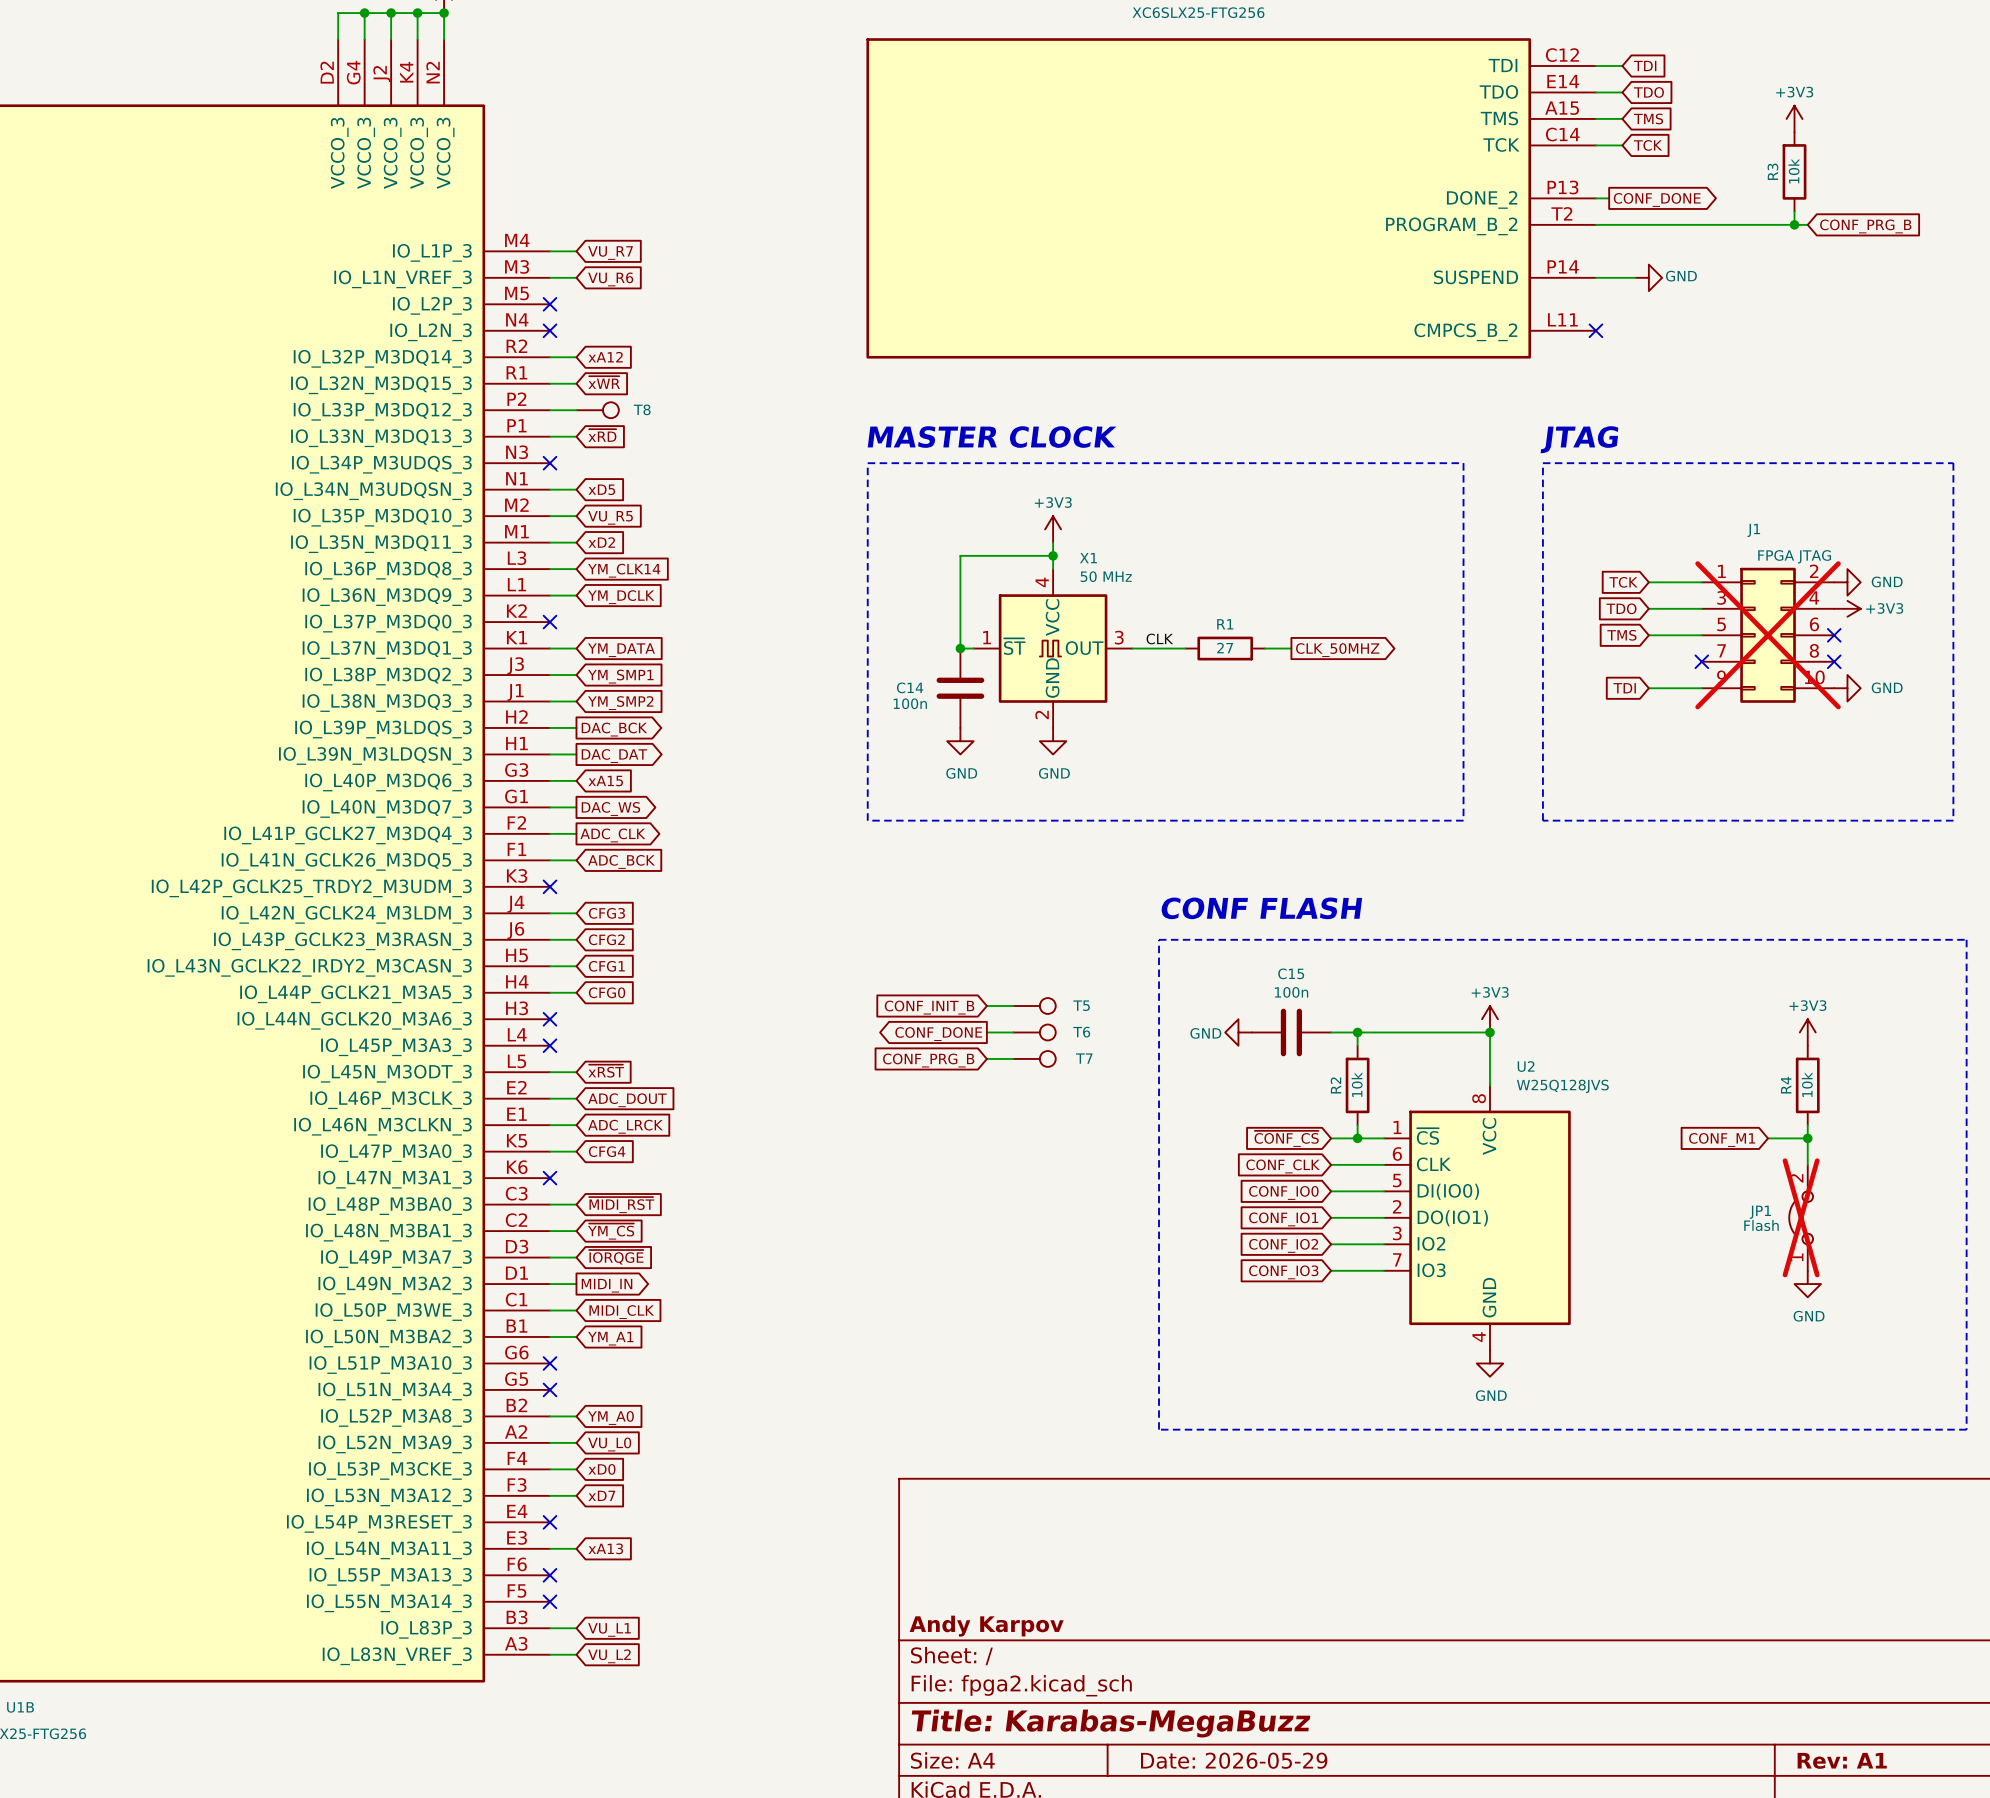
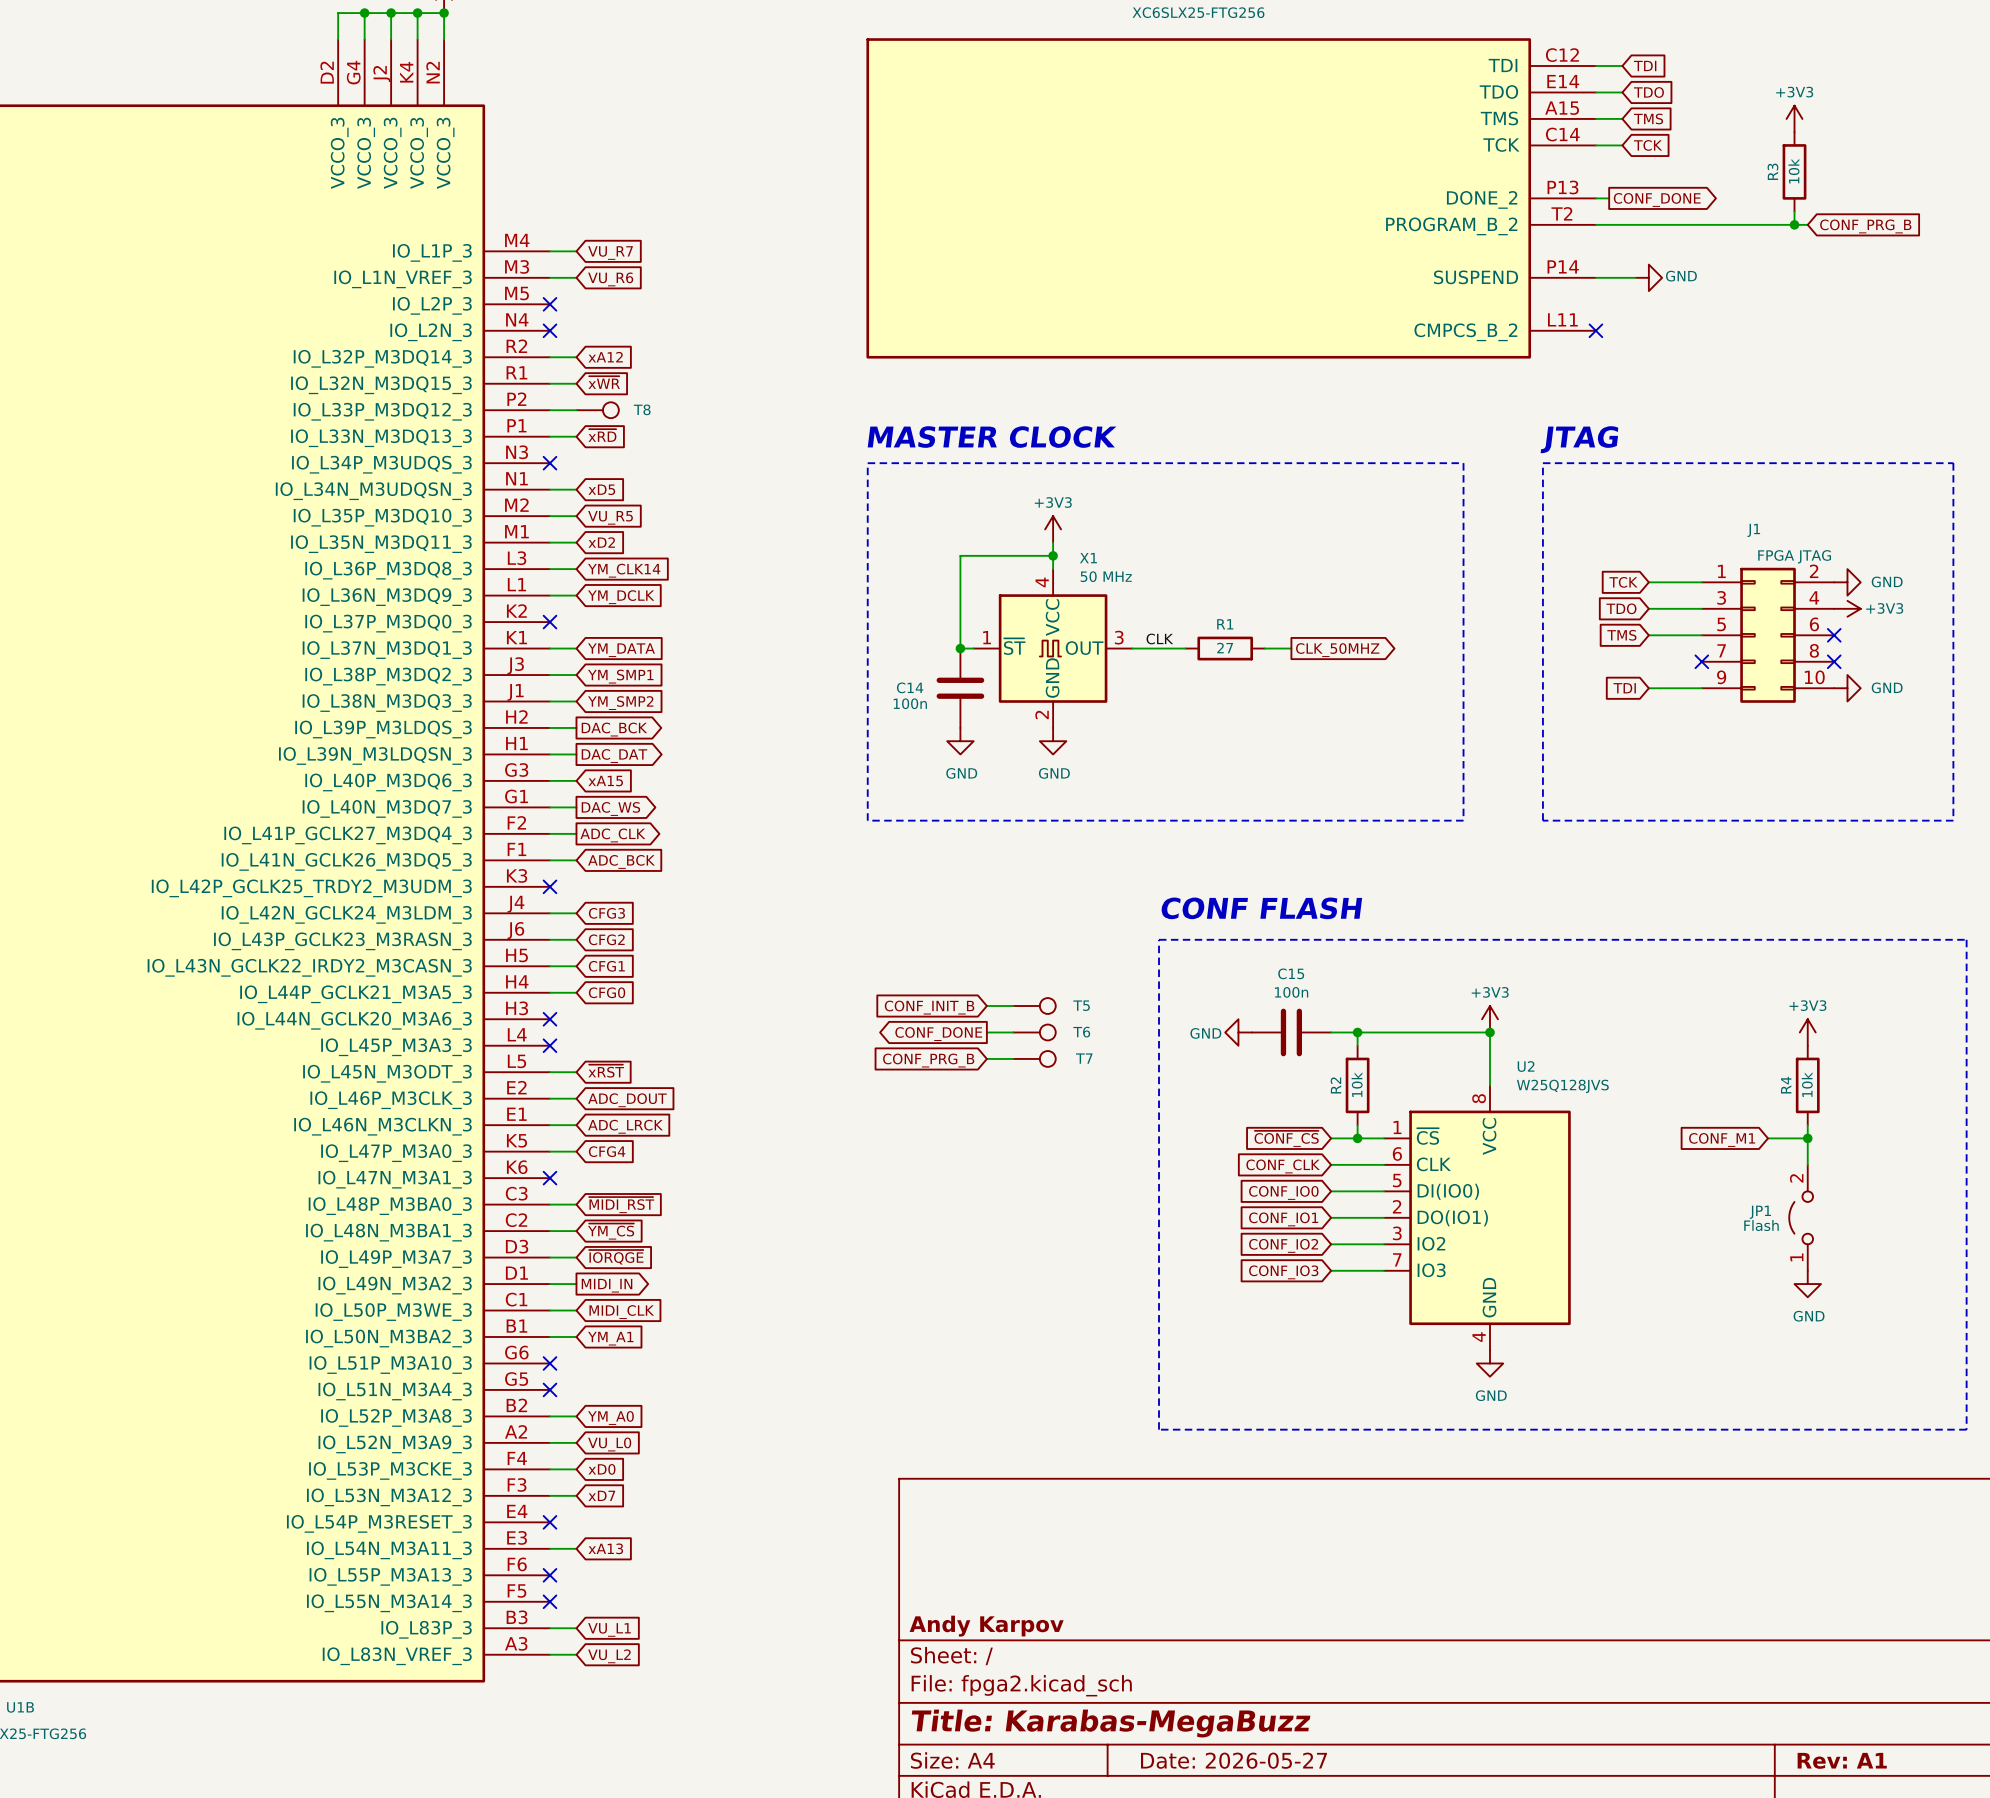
J1 do-not-place cross: (1768, 635) -> none
JP1 do-not-place cross: (1801, 1217) -> none
title block: Date: 2026-05-29 (1234, 1760) -> Date: 2026-05-27 (1234, 1760)

